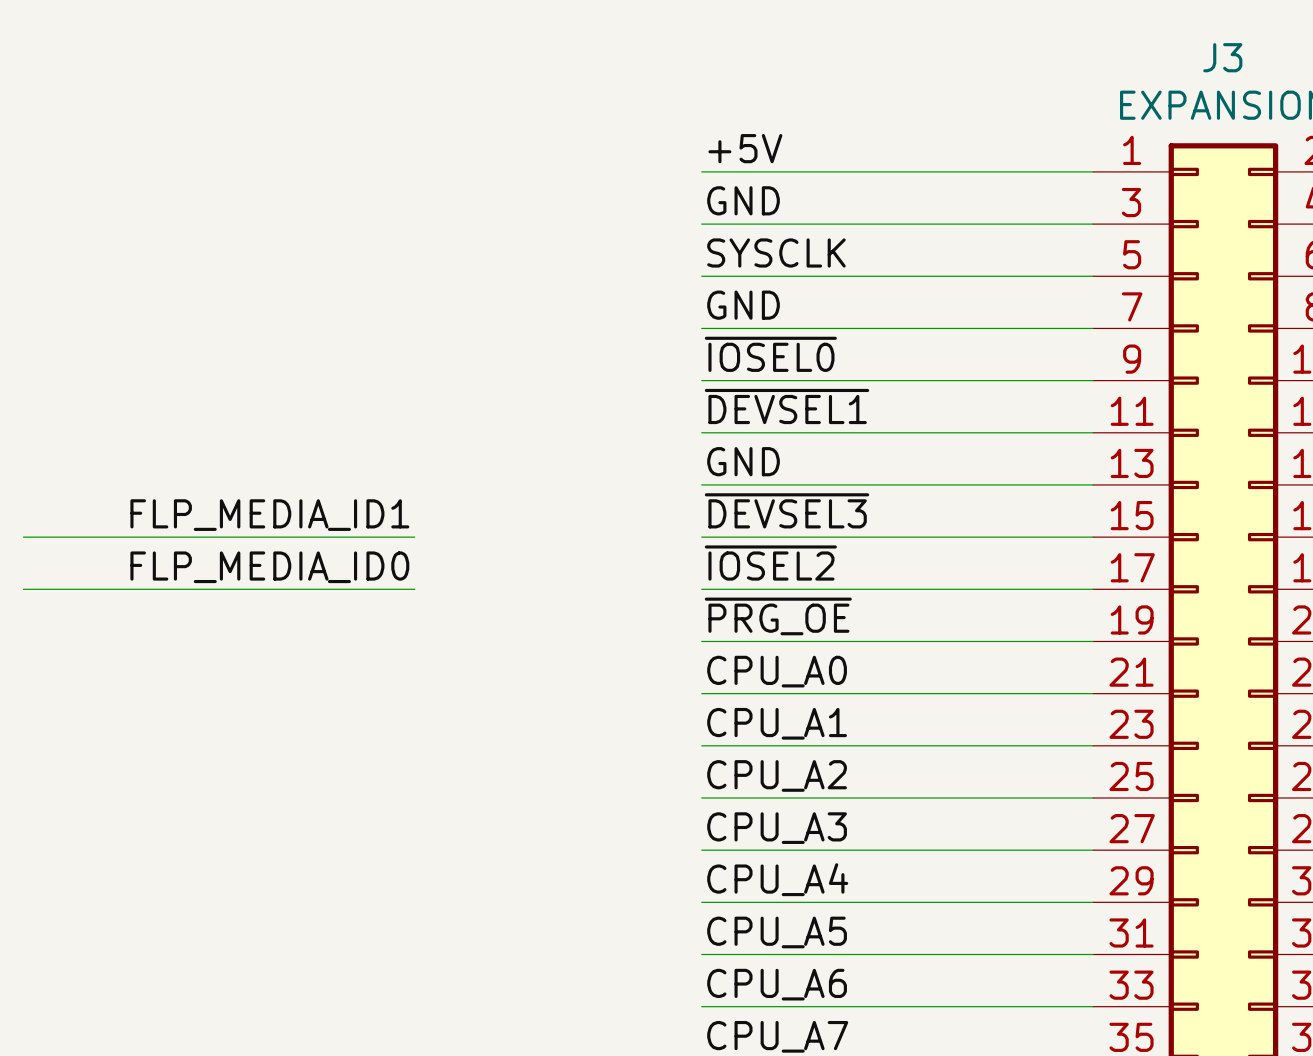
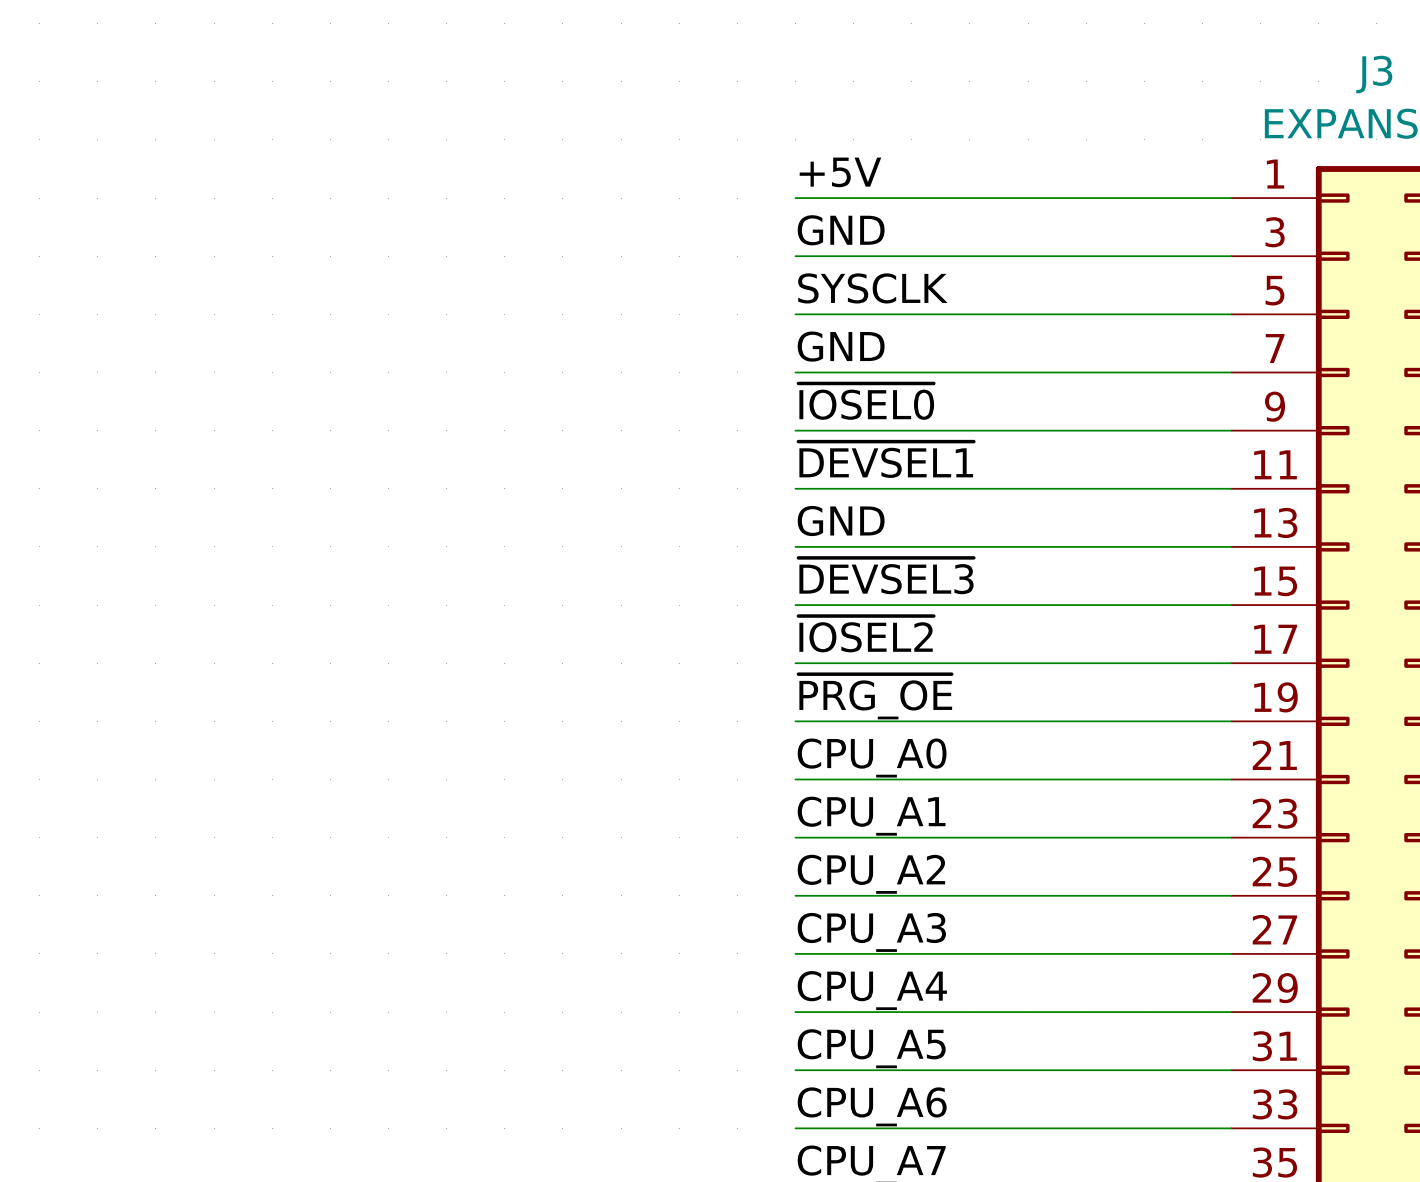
label: FLP_MEDIA_ID1 (269, 515) -> none
wire: (23, 537) (414, 537) -> none
label: FLP_MEDIA_ID0 (269, 567) -> none
wire: (23, 589) (414, 589) -> none

